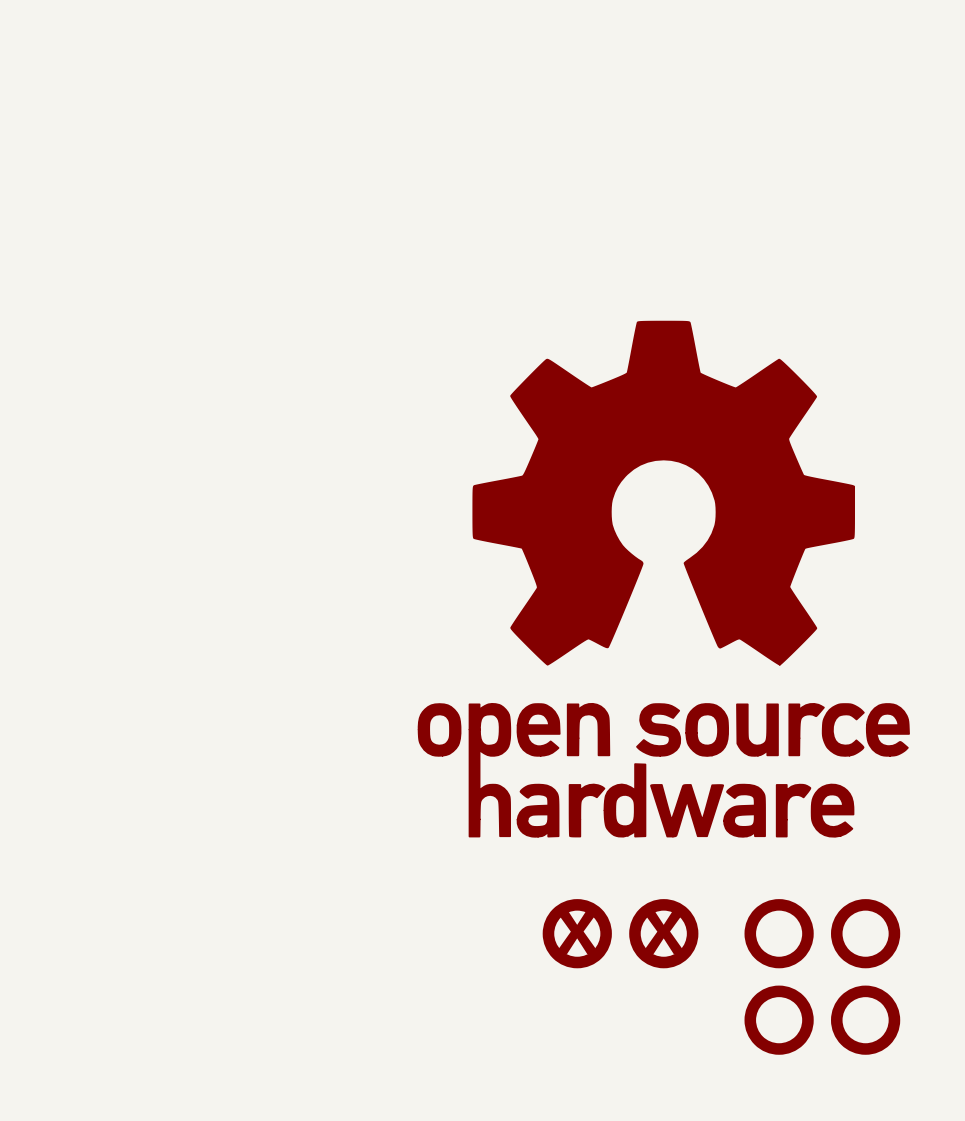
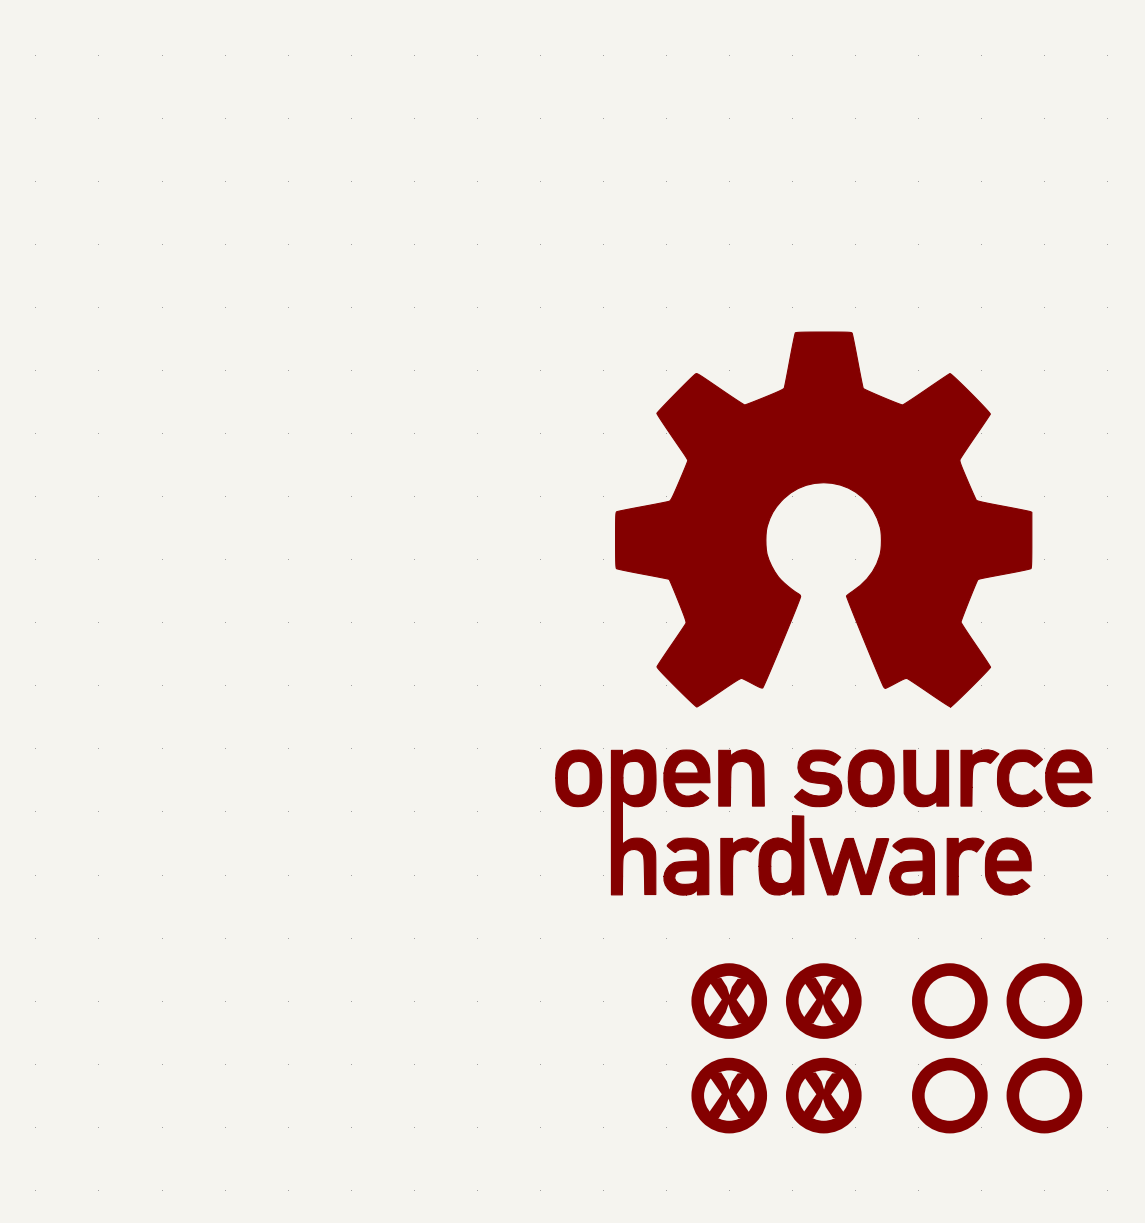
part: none -> (729, 1095)
part: none -> (823, 1095)

